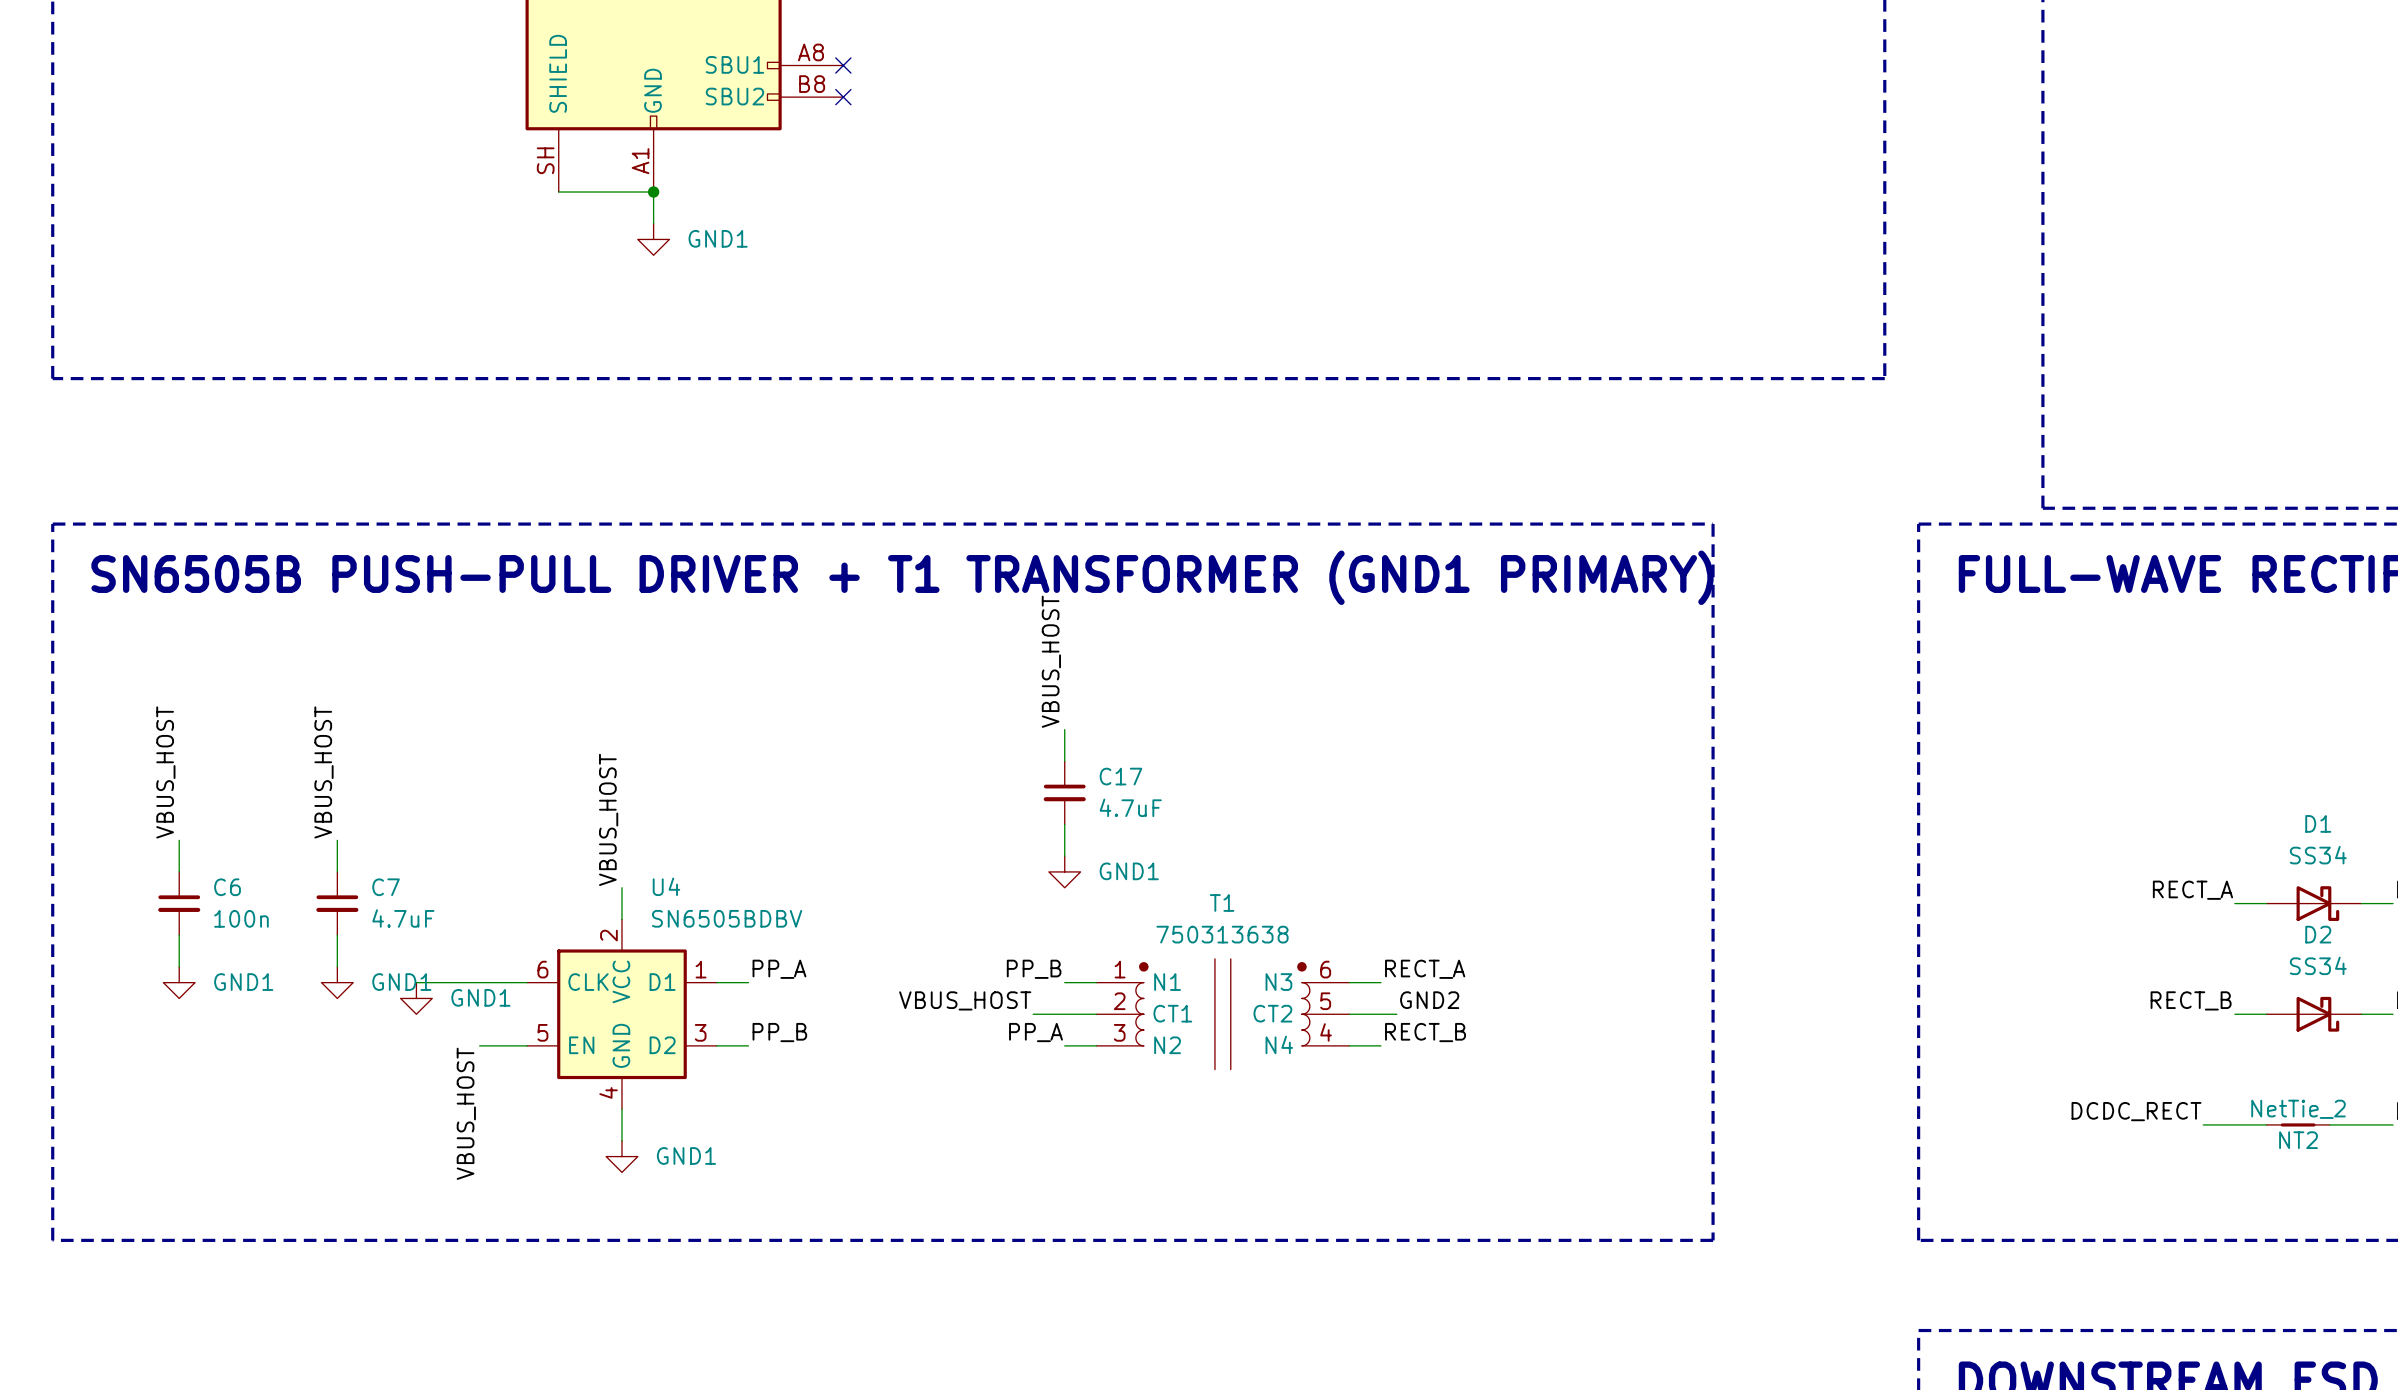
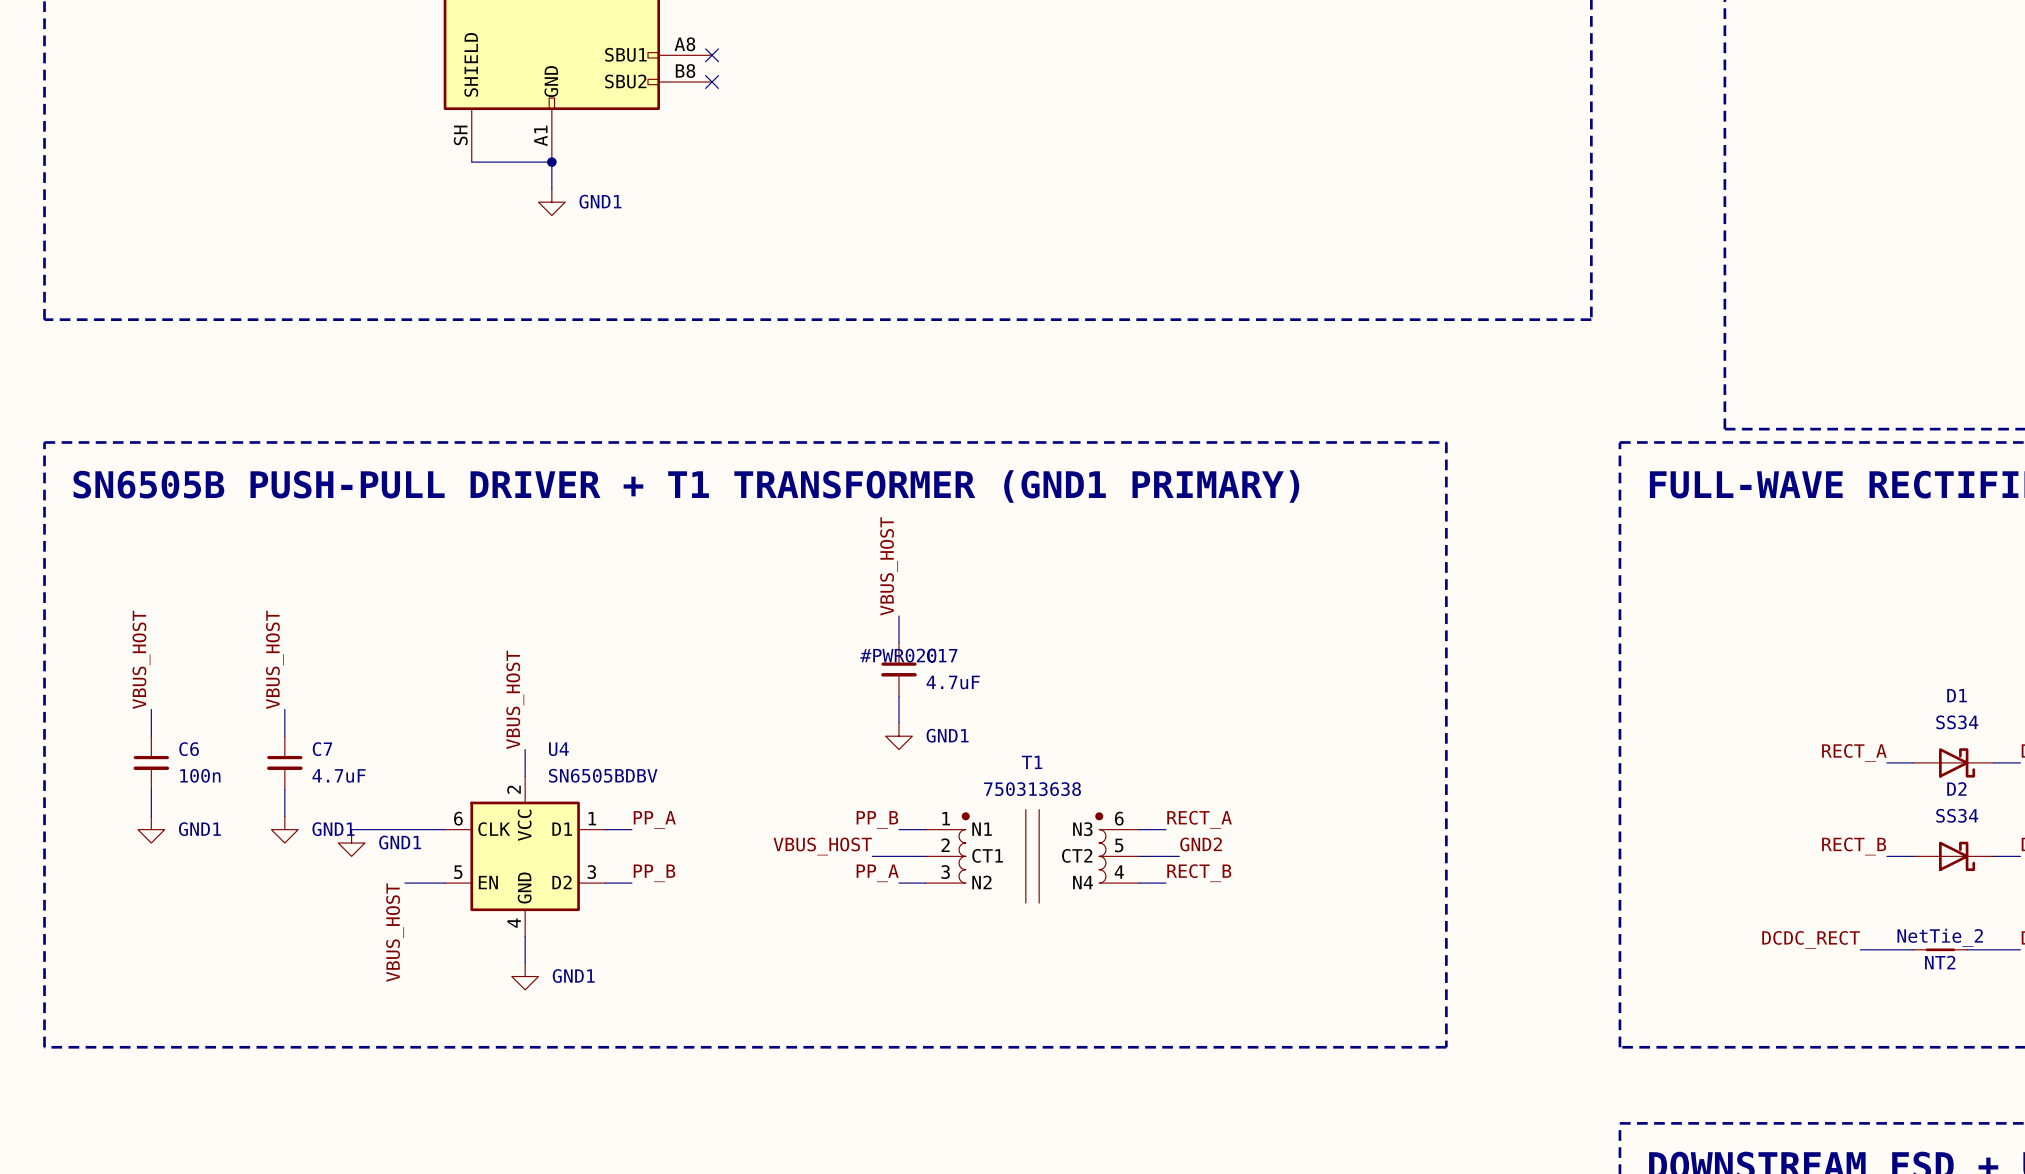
#PWR020 name: none -> #PWR020 (898, 655)

